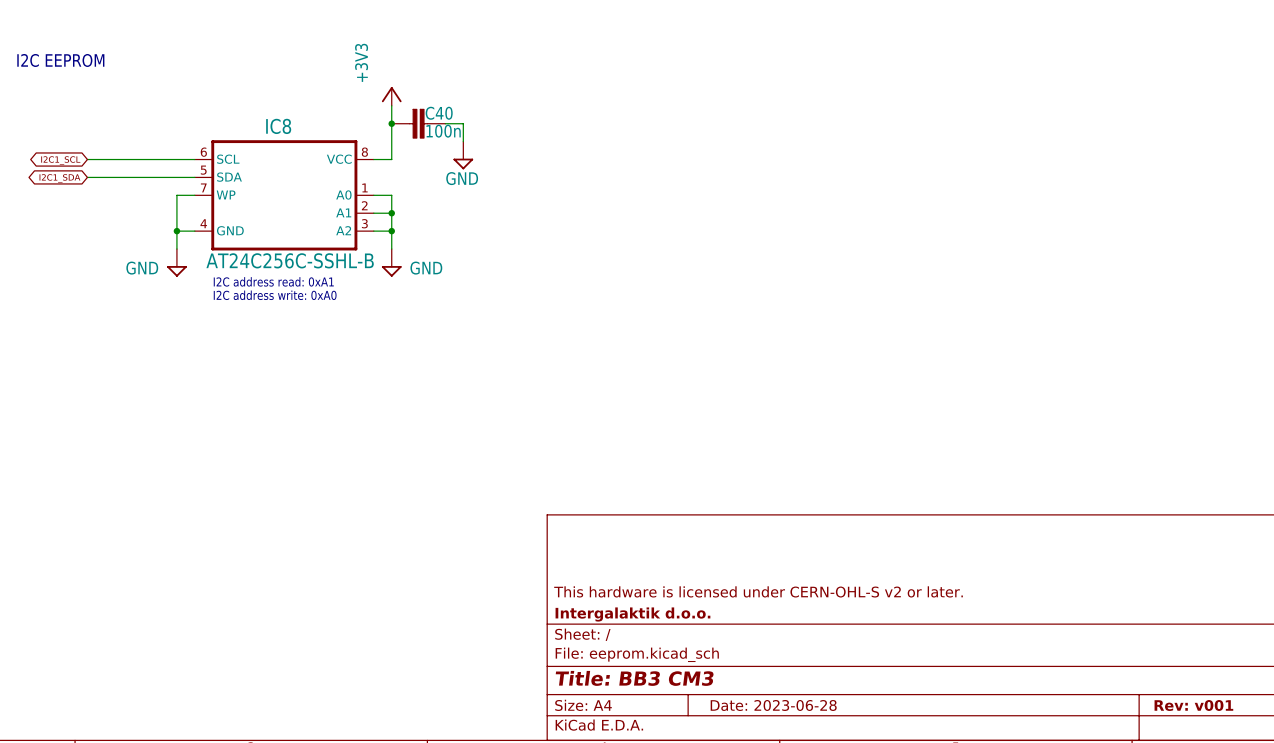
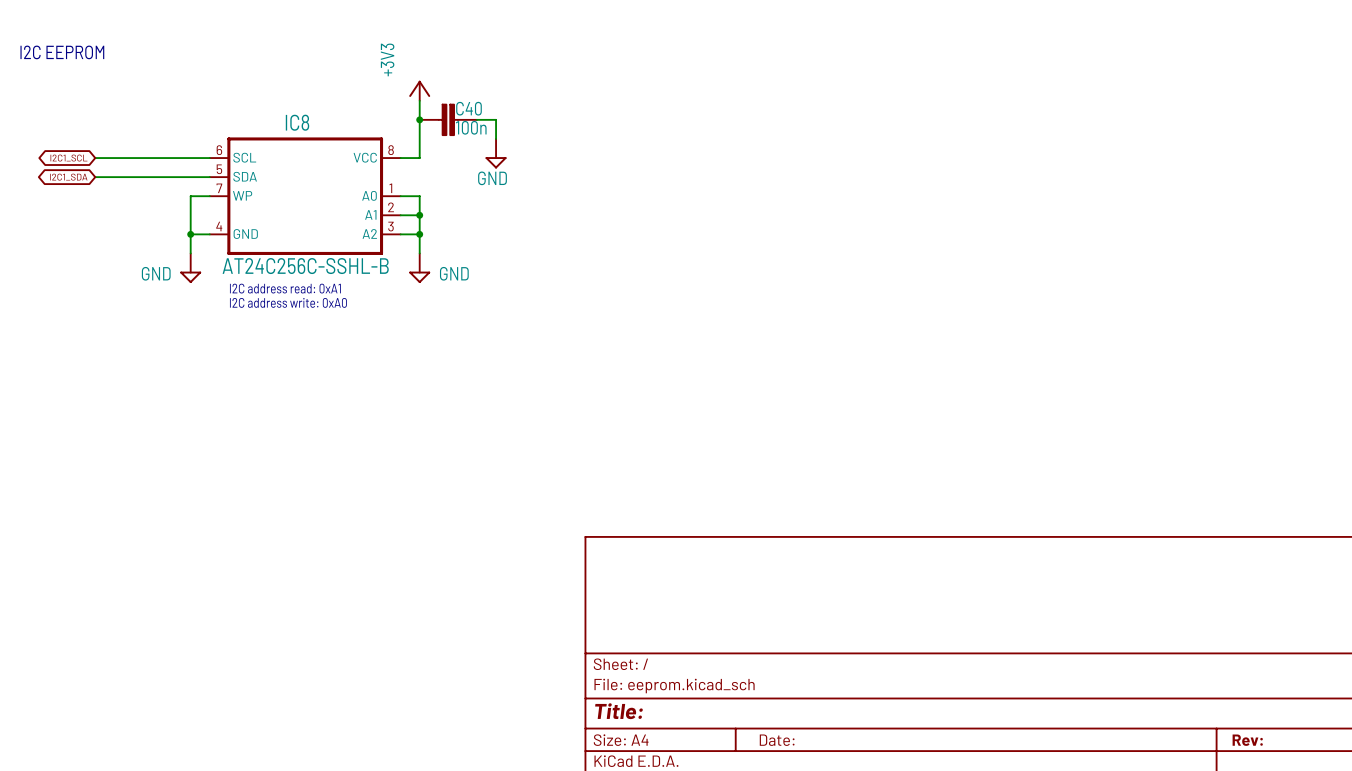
title block: This hardware is licensed under CERN-OHL-S v2 or later. (758, 591) -> none
title block: Intergalaktik d.o.o. (632, 614) -> none
title block: Title: BB3 CM3 (634, 678) -> Title: (619, 711)
title block: Date: 2023-06-28 (773, 705) -> Date: (777, 740)
title block: Rev: v001 (1193, 705) -> Rev: (1247, 740)

